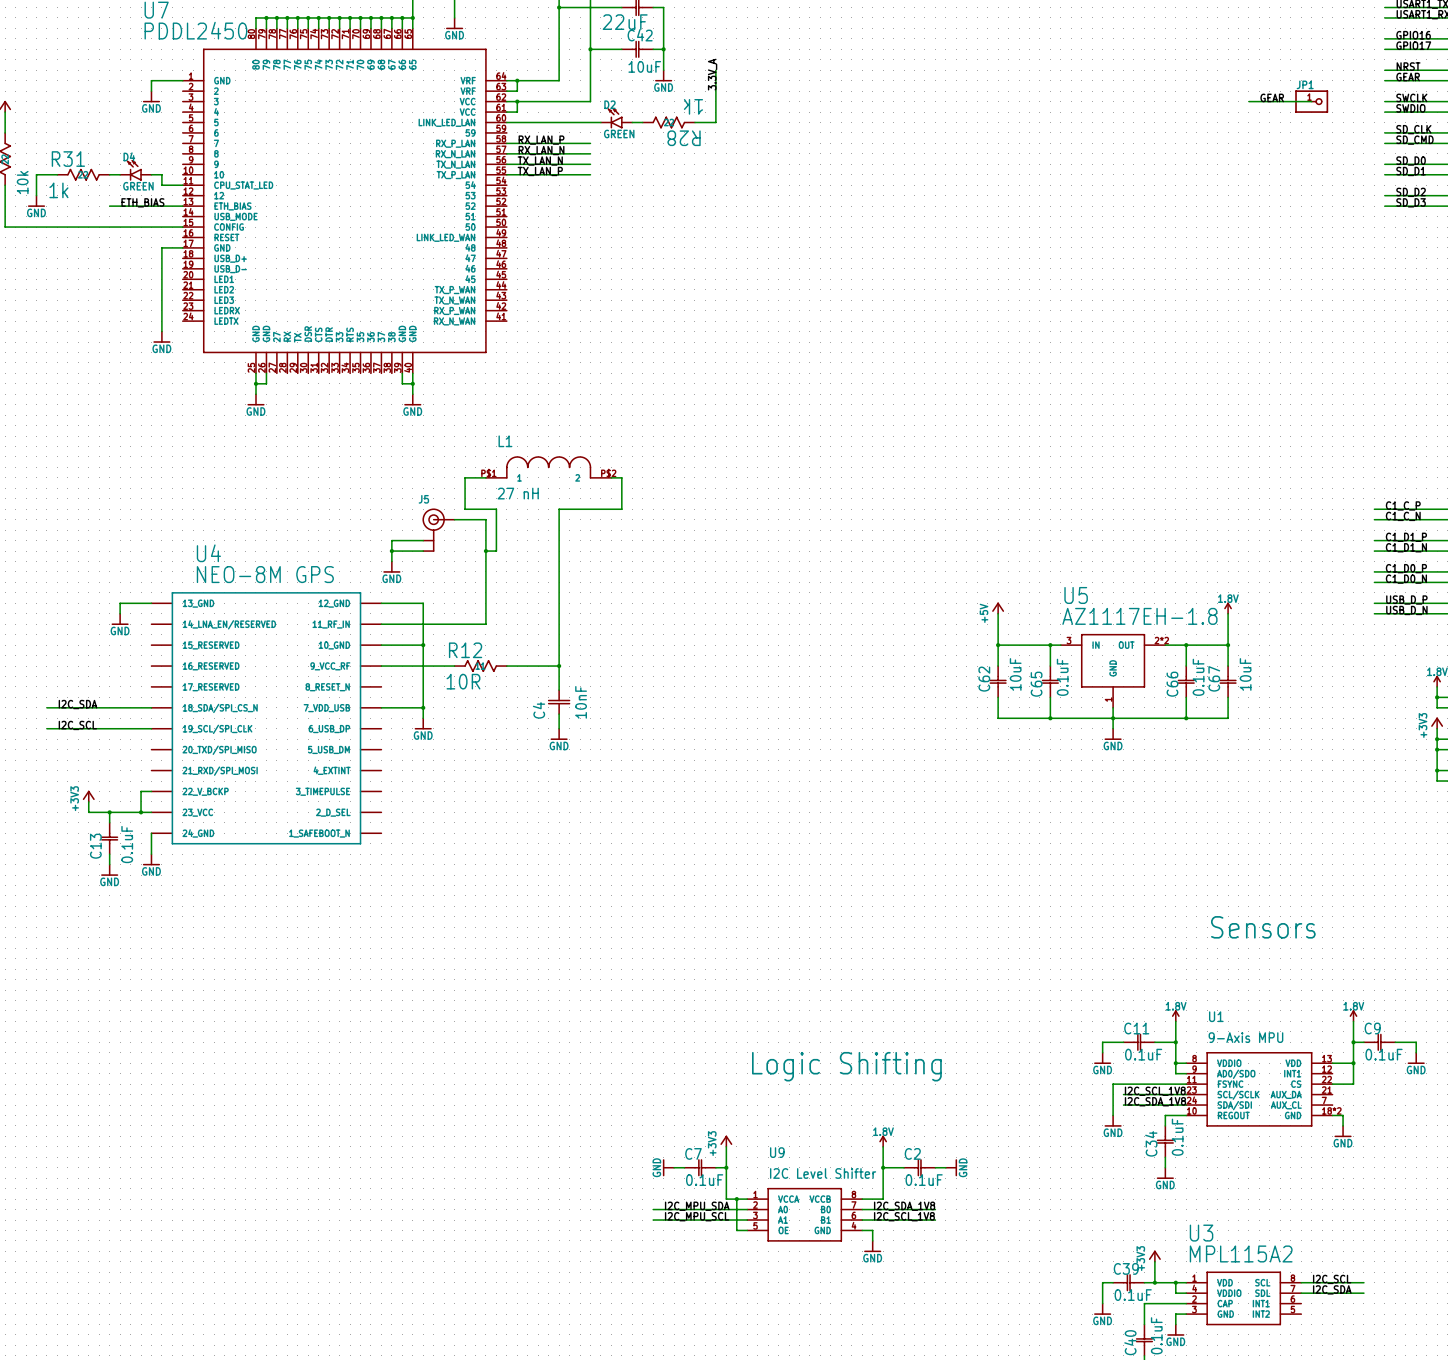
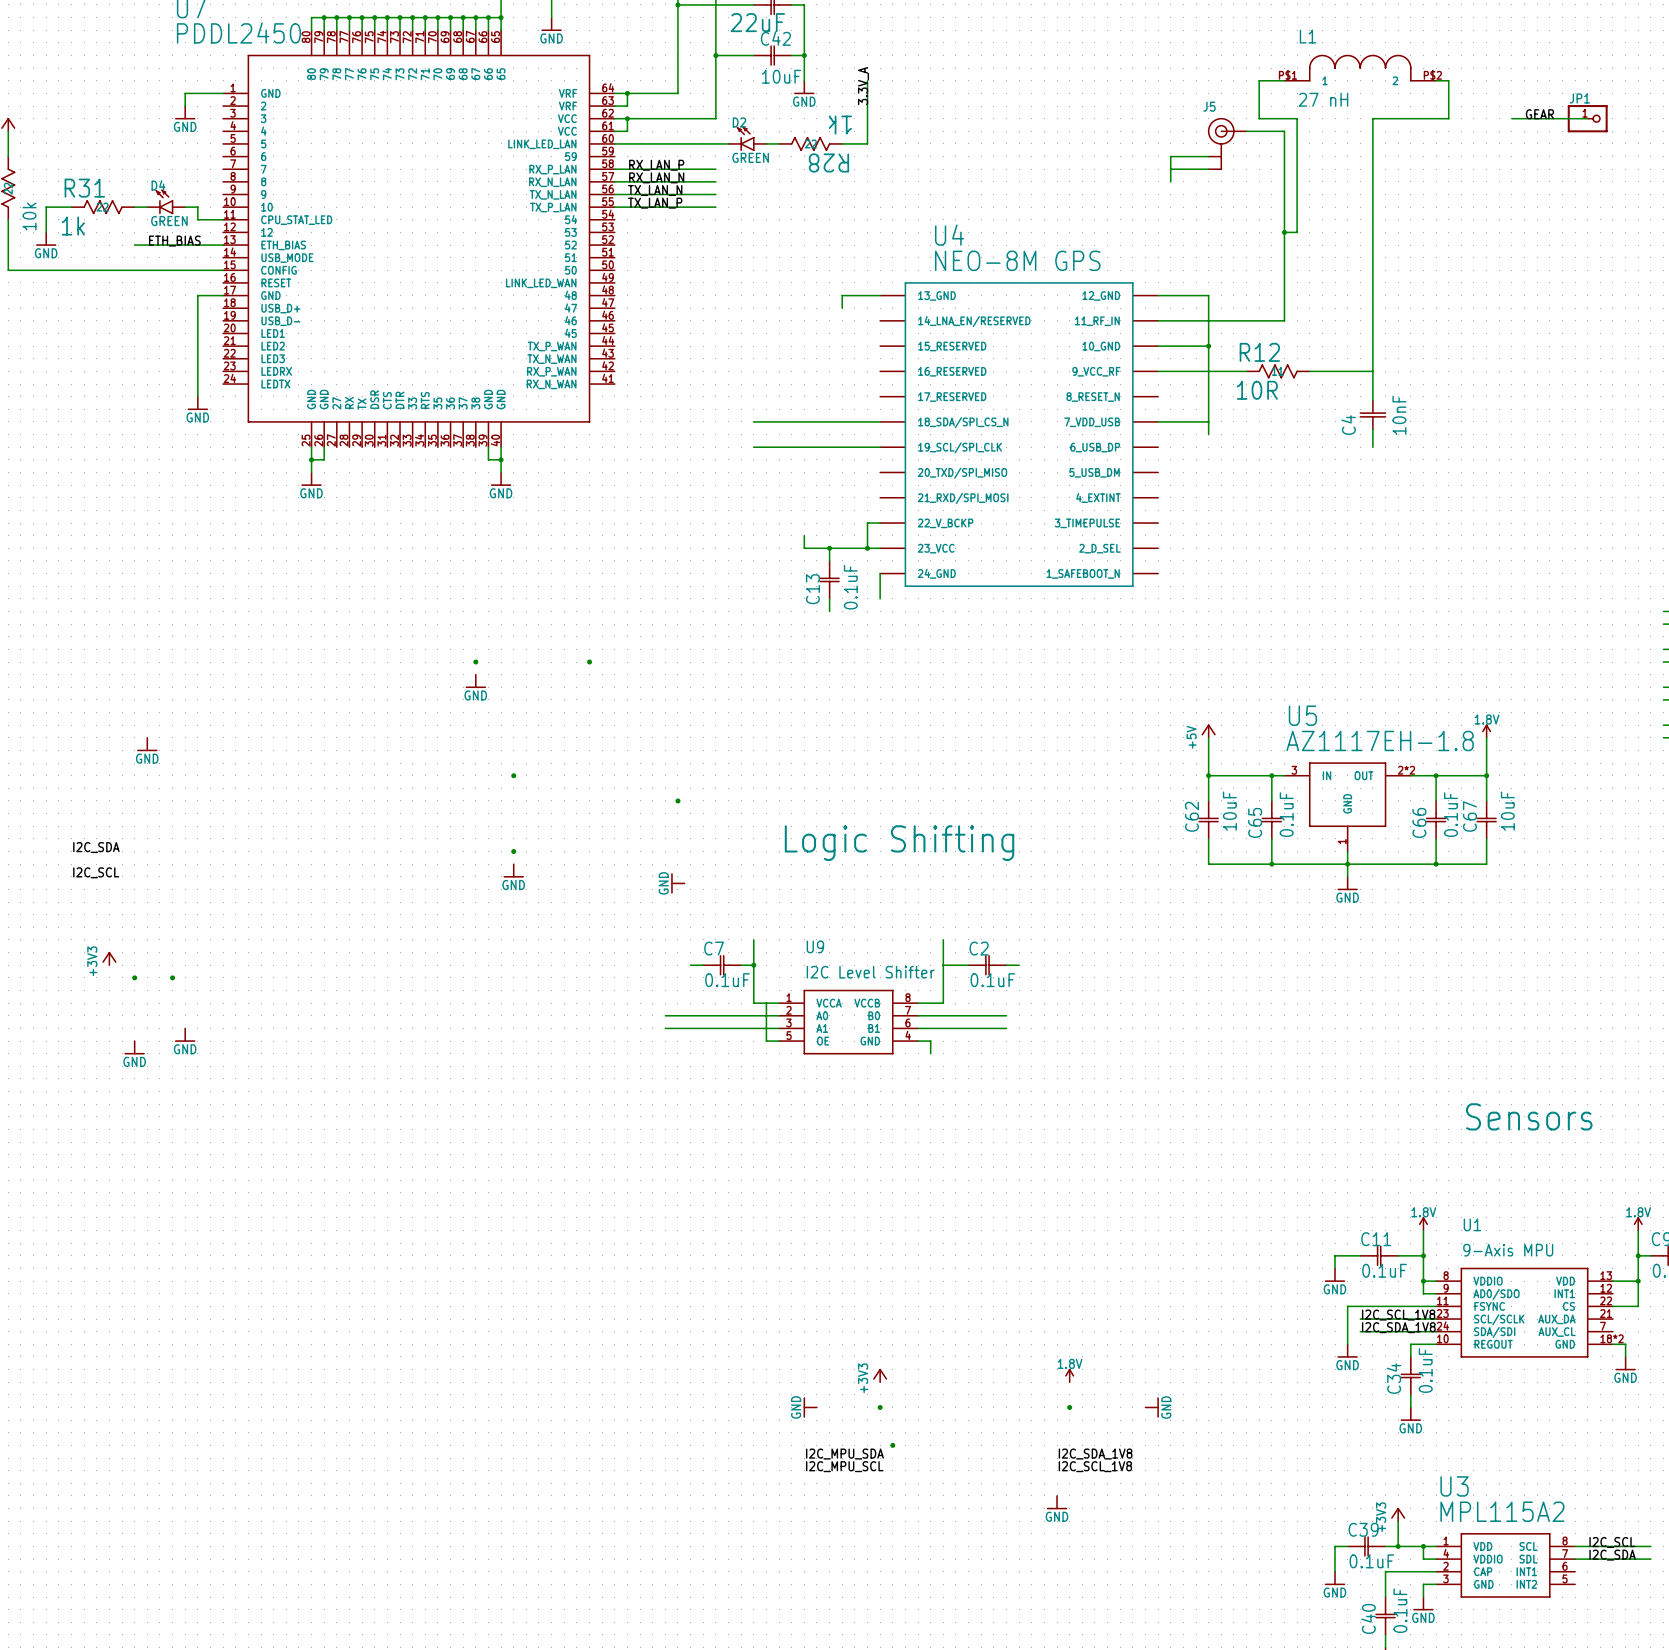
wire: none -> (1284, 80) (1259, 80) (1259, 118) (1297, 118) (1297, 232) (1284, 232)
wire: none -> (1436, 80) (1448, 80) (1448, 118) (1372, 118) (1372, 400)
wire: none -> (1246, 131) (1284, 131) (1284, 320) (1158, 320)
wire: none -> (1208, 156) (1170, 156) (1170, 181)
wire: none -> (1170, 169) (1208, 169)
junction: none -> (1284, 232)
wire: none -> (880, 295) (842, 295) (842, 308)
wire: none -> (1158, 295) (1208, 295) (1208, 434)
wire: none -> (1158, 346) (1208, 346)
junction: none -> (1208, 346)
wire: none -> (1158, 371) (1246, 371)
wire: none -> (1309, 371) (1372, 371)
wire: none -> (753, 421) (880, 421)
wire: none -> (1158, 421) (1208, 421)
wire: none -> (1372, 429) (1372, 447)
wire: none -> (753, 447) (880, 447)
wire: none -> (880, 523) (867, 523) (867, 548)
wire: none -> (804, 535) (804, 548) (880, 548)
wire: none -> (829, 548) (829, 560)
junction: none -> (829, 548)
junction: none -> (867, 548)
L1 position: (548, 467) -> (1360, 68)
wire: (485, 477) (465, 477) (465, 509) (496, 509) (496, 551) (485, 551) -> none
wire: (611, 477) (621, 477) (621, 509) (559, 509) (559, 690) -> none
wire: none -> (880, 573) (880, 598)
wire: none -> (829, 598) (829, 611)
wire: (454, 519) (485, 519) (485, 624) (381, 624) -> none
J5 position: (438, 530) -> (1227, 143)
wire: (423, 540) (391, 540) (391, 561) -> none
wire: (391, 551) (423, 551) -> none
wire: (151, 603) (120, 603) (120, 613) -> none
wire: (381, 603) (423, 603) (423, 718) -> none
wire: (381, 645) (423, 645) -> none
wire: (381, 666) (454, 666) -> none
R12 position: (480, 666) -> (1278, 371)
wire: (506, 666) (559, 666) -> none
text: none -> Logic Shifting (899, 843)
C4 position: (559, 702) -> (1372, 414)
wire: (46, 707) (151, 707) -> none
wire: (381, 707) (423, 707) -> none
wire: (559, 714) (559, 728) -> none
U4 position: (266, 718) -> (1019, 434)
wire: (46, 728) (151, 728) -> none
power symbol rotation: 0° (559, 739) -> 90° clockwise (671, 883)
wire: none -> (753, 939) (753, 1003) (779, 1003)
wire: none -> (943, 939) (943, 1003) (918, 1003)
wire: (151, 791) (141, 791) (141, 812) -> none
wire: (88, 801) (88, 812) (151, 812) -> none
wire: none -> (690, 965) (703, 965)
wire: none -> (741, 965) (753, 965)
junction: none -> (753, 965)
wire: none -> (943, 965) (968, 965)
wire: none -> (1006, 965) (1019, 965)
wire: (109, 812) (109, 822) -> none
wire: (151, 833) (151, 854) -> none
wire: none -> (766, 1003) (766, 1041) (779, 1041)
C13 position: (109, 838) -> (829, 579)
wire: none -> (665, 1015) (779, 1015)
wire: none -> (918, 1015) (1006, 1015)
wire: (109, 854) (109, 864) -> none
wire: none -> (665, 1028) (779, 1028)
wire: none -> (918, 1028) (1006, 1028)
wire: none -> (918, 1041) (930, 1041) (930, 1053)
text: Logic Shifting (846, 1066) -> none
wire: (726, 1146) (726, 1199) (747, 1199) -> none
wire: (883, 1146) (883, 1199) (862, 1199) -> none
wire: (674, 1167) (684, 1167) -> none
C7 position: (700, 1167) -> (722, 965)
wire: (715, 1167) (726, 1167) -> none
wire: (883, 1167) (904, 1167) -> none
C2 position: (919, 1167) -> (987, 965)
wire: (935, 1167) (945, 1167) -> none
wire: (736, 1199) (736, 1230) (747, 1230) -> none
wire: (653, 1209) (747, 1209) -> none
wire: (862, 1209) (935, 1209) -> none
U9 position: (804, 1214) -> (848, 1022)
wire: (653, 1220) (747, 1220) -> none
wire: (862, 1220) (935, 1220) -> none
wire: (862, 1230) (872, 1230) (872, 1240) -> none

